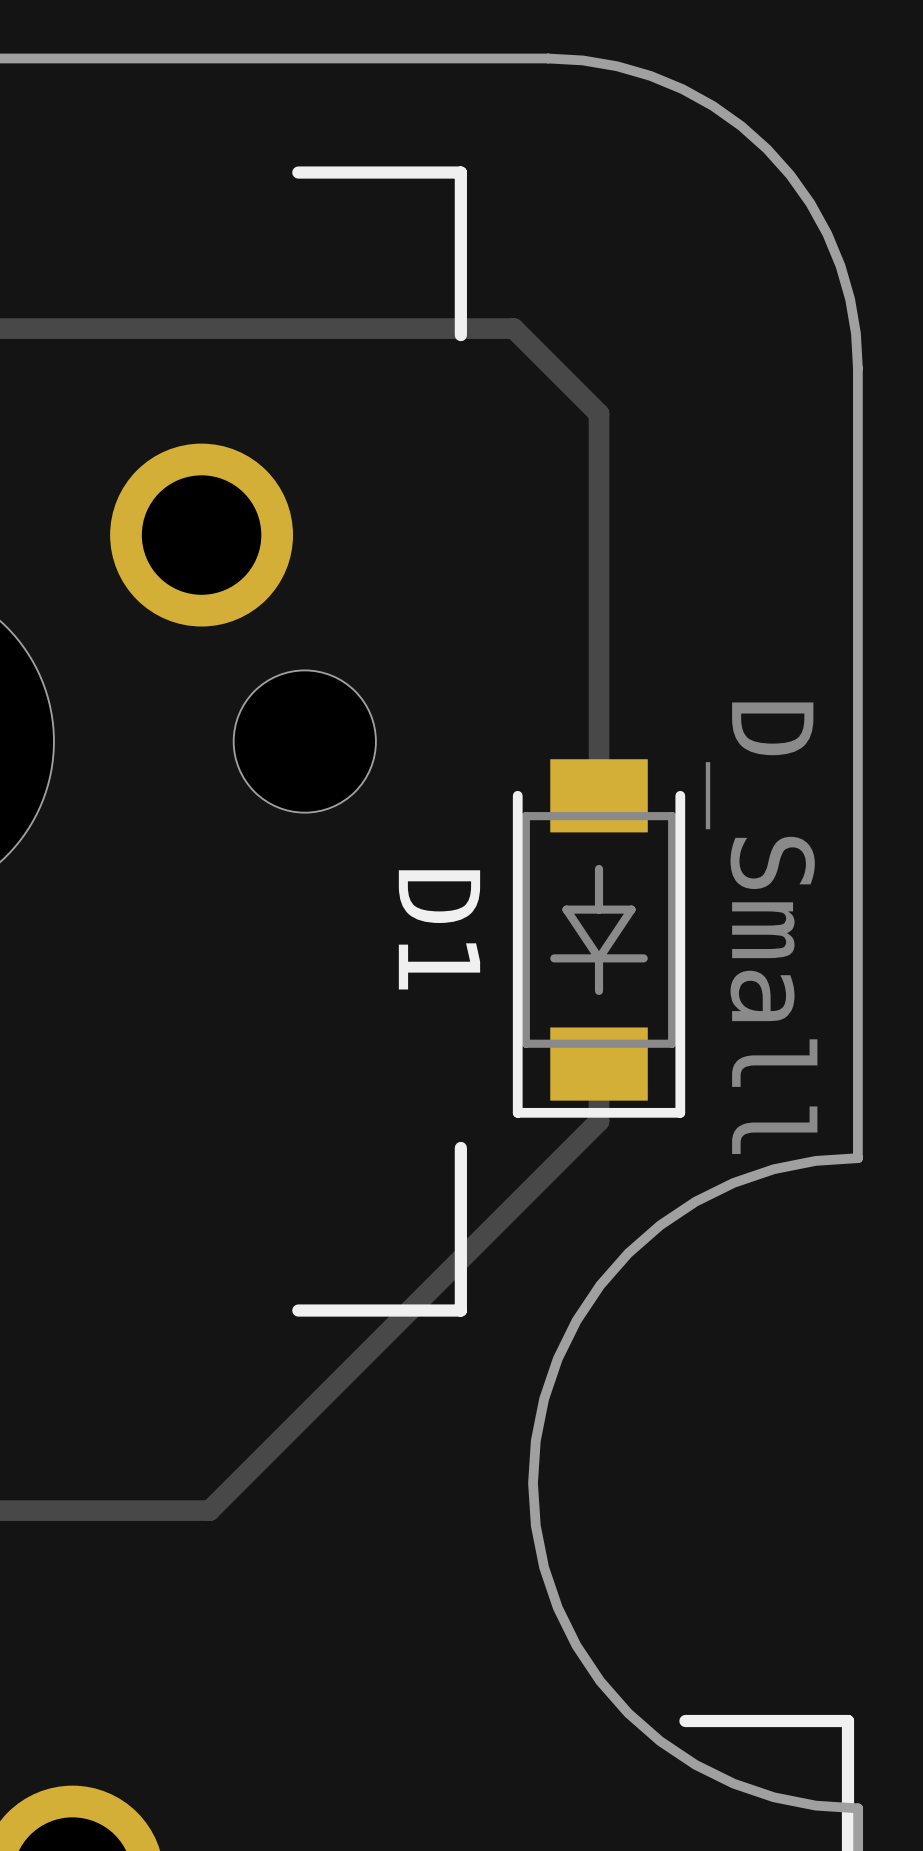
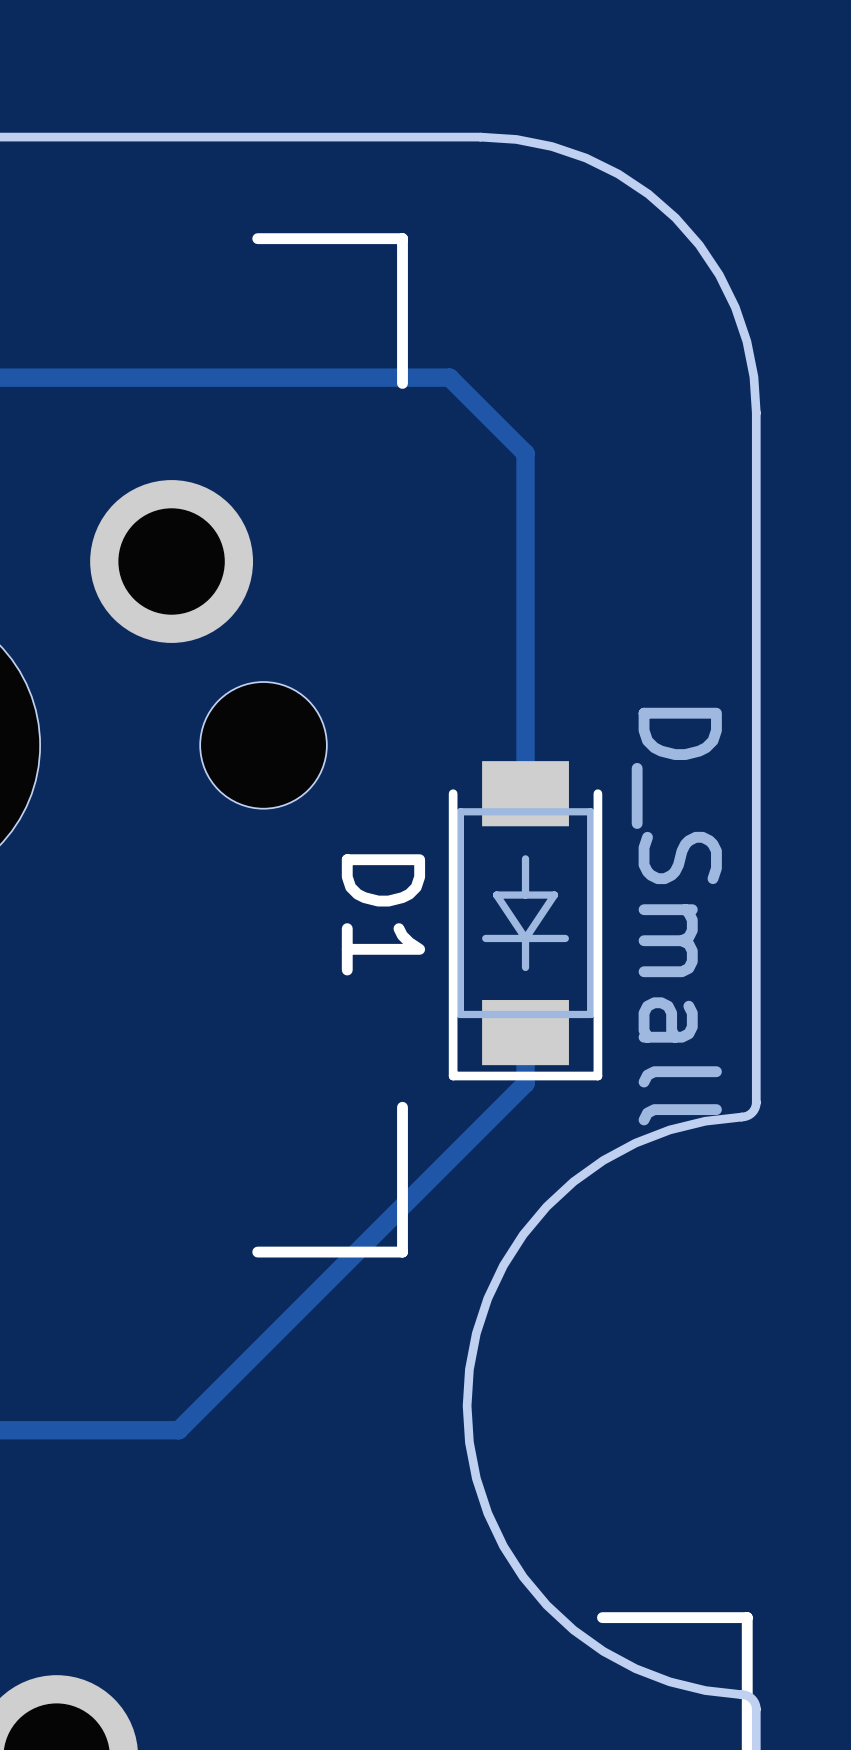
board edge: (548, 58) (582, 60) (617, 66) (650, 75) (682, 89) (712, 105) (741, 126) (767, 149) (790, 175) (810, 203) (827, 233) (840, 265) (850, 299) (855, 333) (857, 368) (857, 1158) -> (480, 137) (516, 139) (551, 146) (586, 158) (618, 174) (648, 194) (675, 217) (699, 245) (719, 274) (735, 307) (746, 341) (753, 376) (756, 412) (756, 1102) (752, 1112) (741, 1116)
board edge: (858, 1158) (815, 1160) (774, 1169) (733, 1182) (695, 1201) (660, 1225) (628, 1253) (600, 1285) (576, 1320) (557, 1358) (544, 1399) (535, 1440) (533, 1483) (535, 1525) (544, 1567) (557, 1607) (576, 1645) (600, 1681) (628, 1713) (660, 1741) (695, 1764) (733, 1783) (774, 1797) (815, 1805) (858, 1808) (858, 1823) -> (741, 1117) (705, 1121) (669, 1129) (635, 1143) (603, 1160) (573, 1181) (546, 1206) (523, 1234) (503, 1265) (487, 1298) (476, 1333) (469, 1369) (467, 1405) (469, 1442) (476, 1478) (487, 1513) (503, 1546) (523, 1577) (546, 1605) (573, 1630) (603, 1651) (635, 1668) (669, 1681) (705, 1690) (745, 1695) (753, 1700) (756, 1709)

